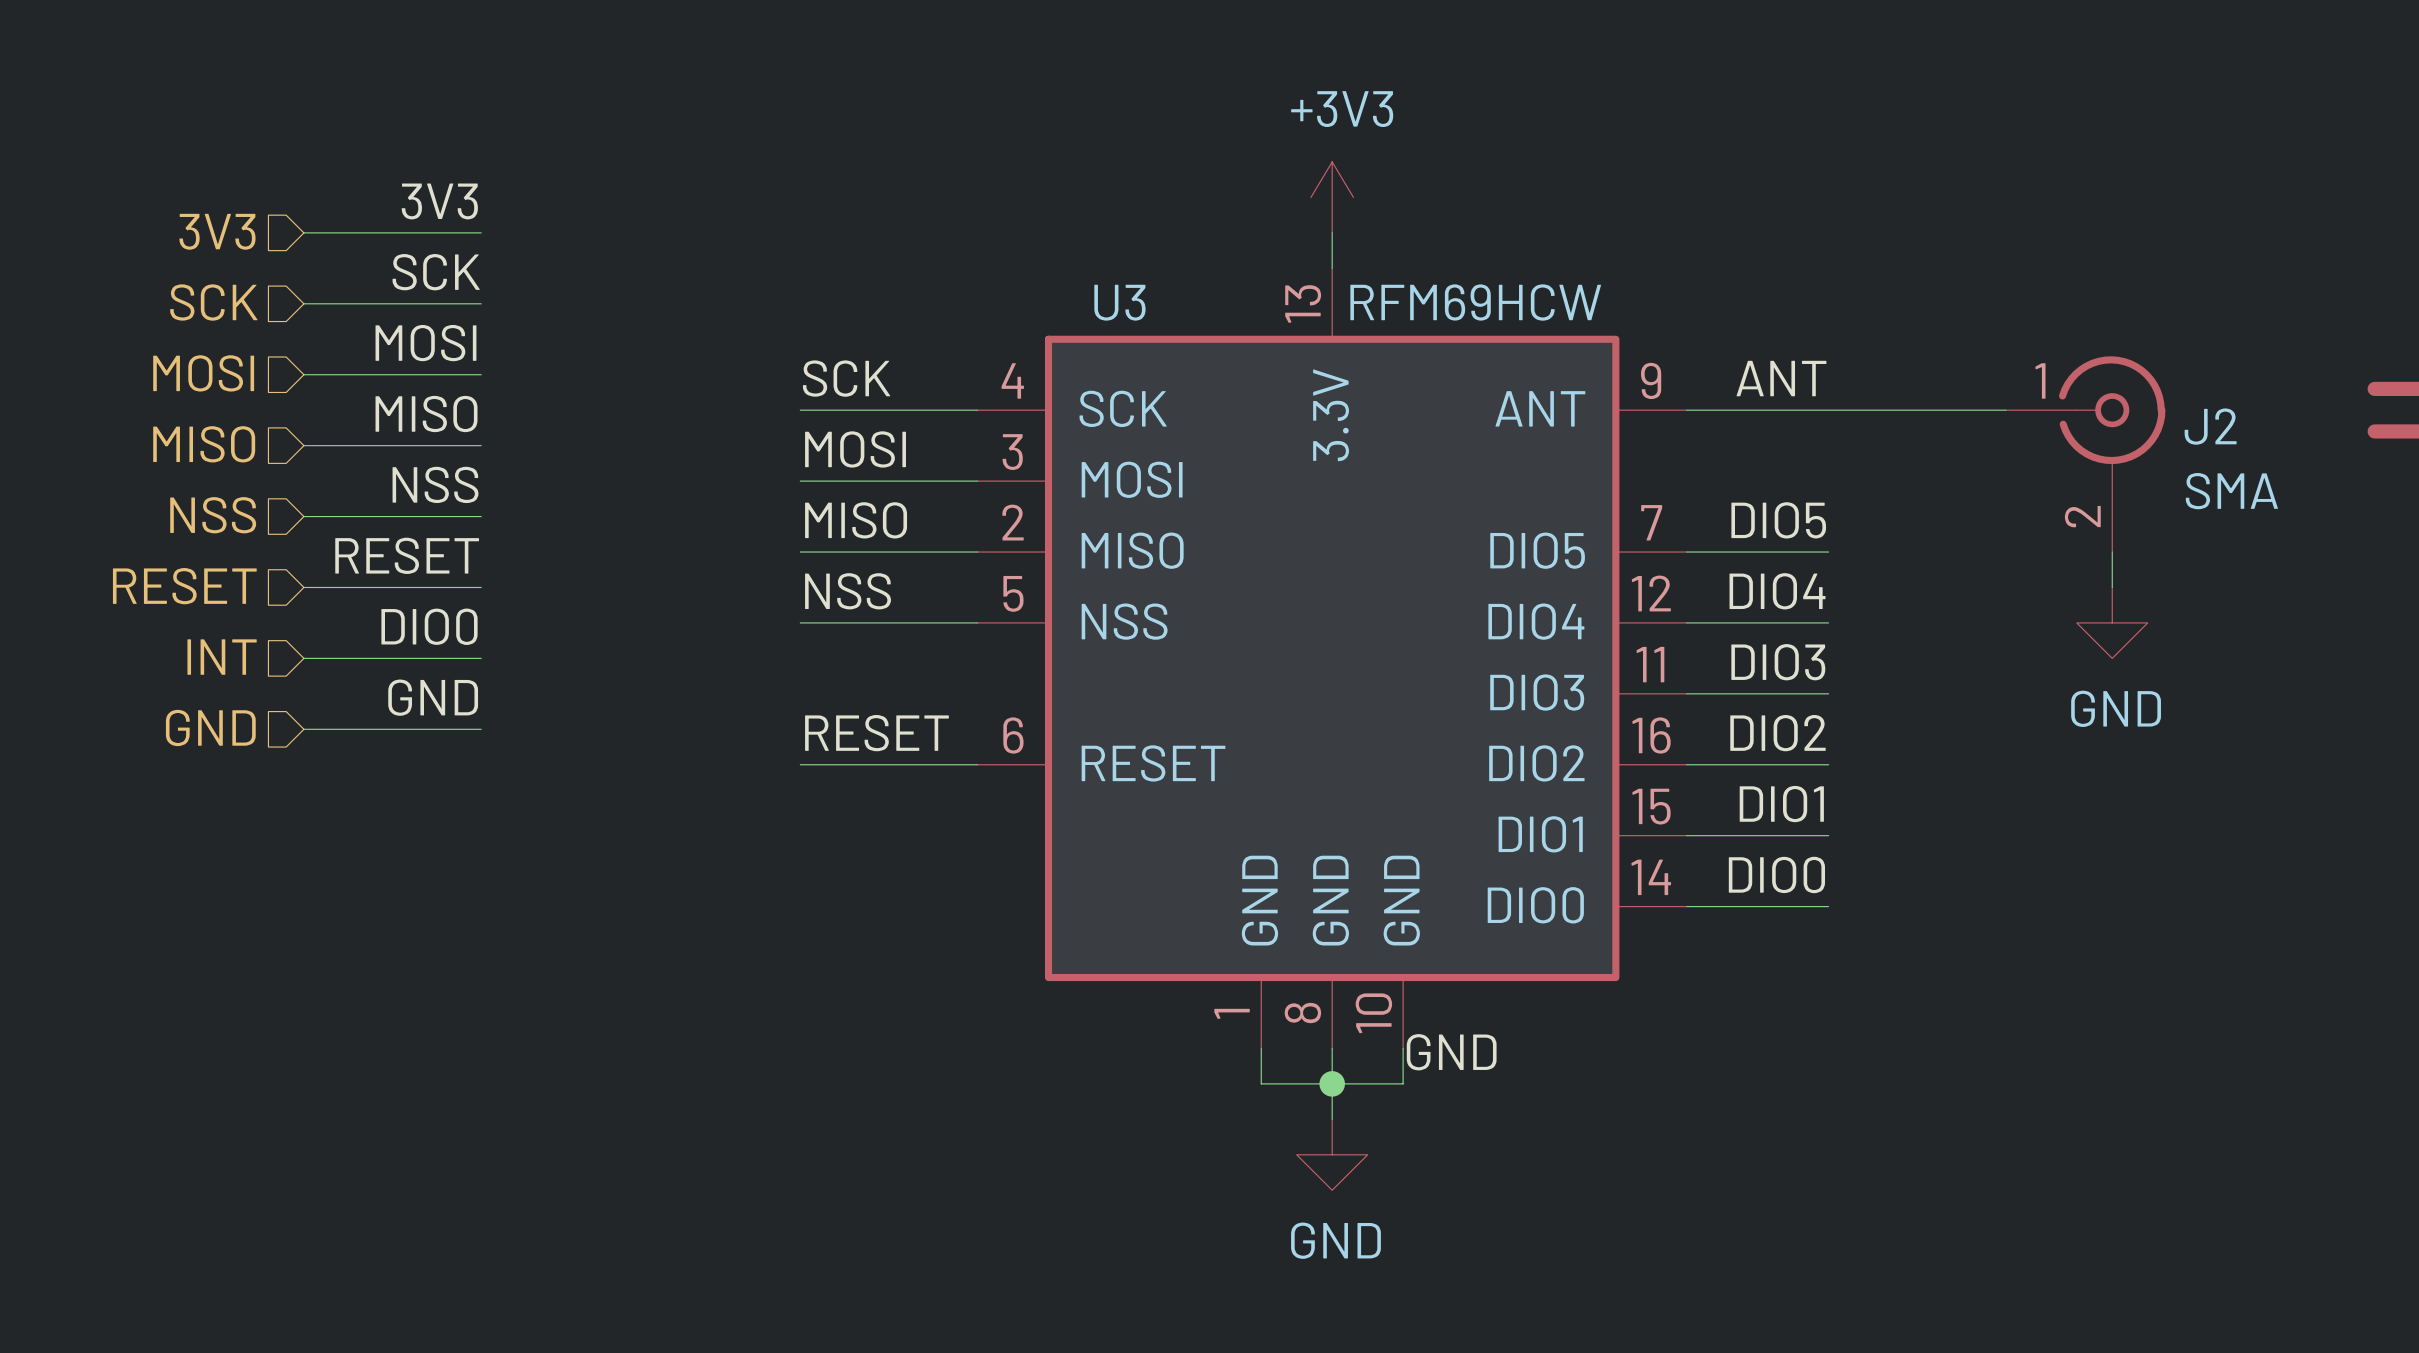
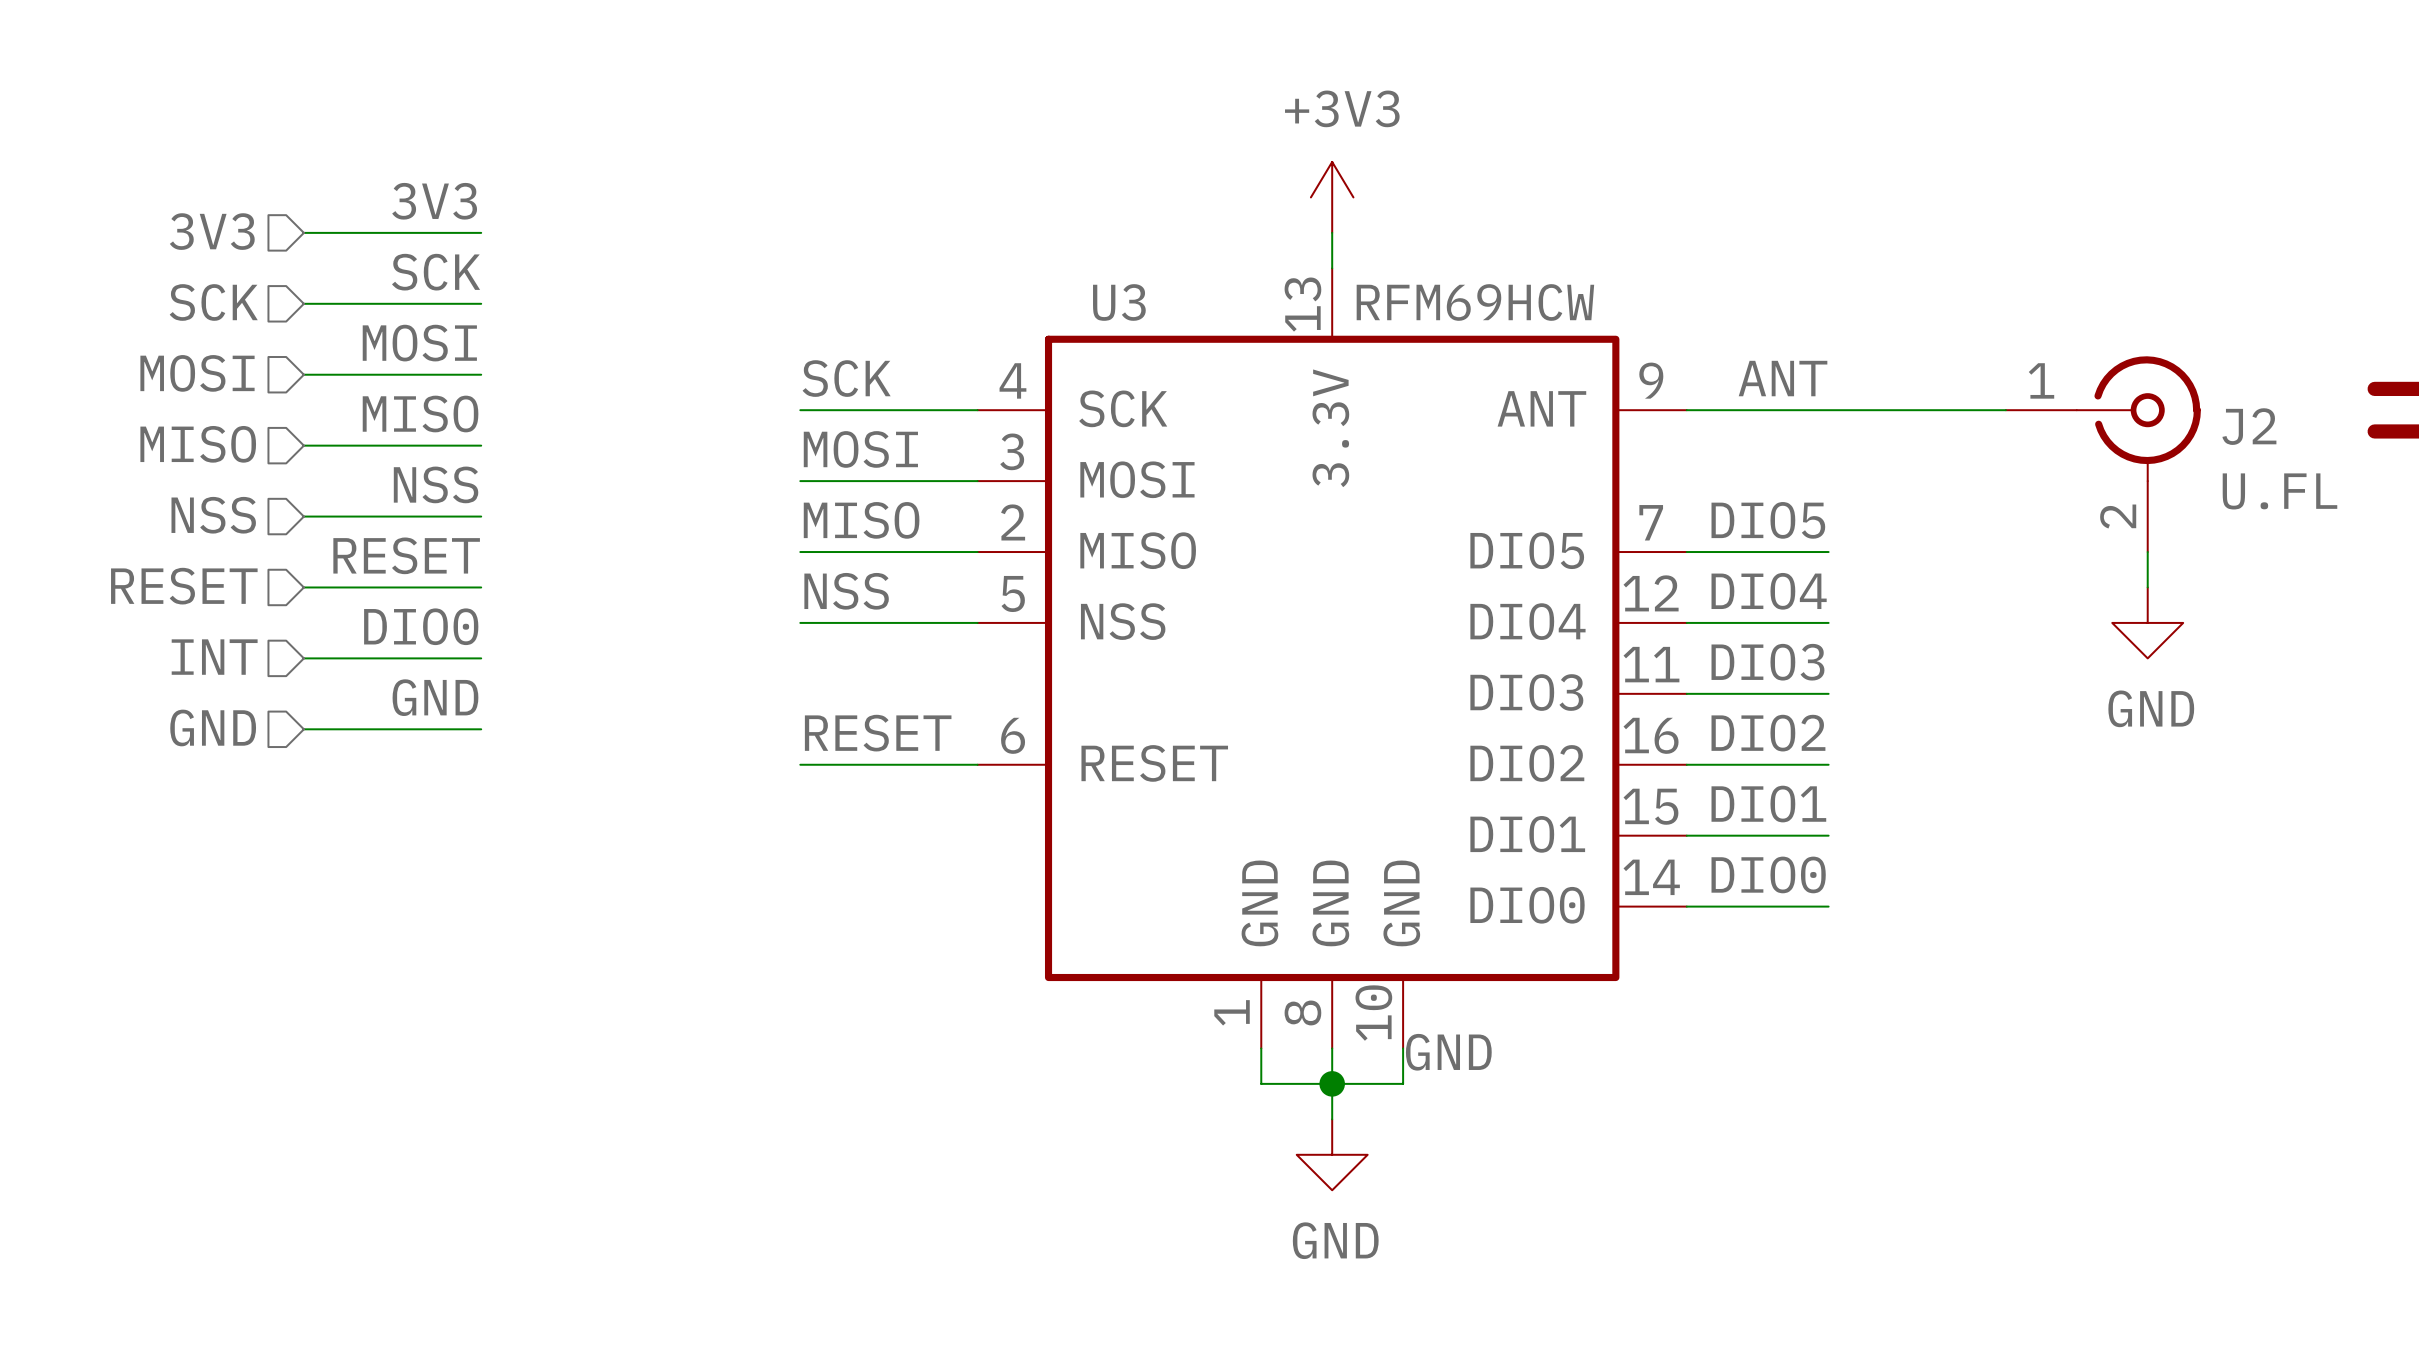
J2 symbol: [2005, 356, 2166, 553] -> [2005, 356, 2201, 553]
J2 value: SMA (2231, 491) -> U.FL (2279, 491)
wire: (2112, 552) (2112, 587) -> (2147, 552) (2147, 587)
power symbol position: GND (2112, 622) -> GND (2147, 622)

